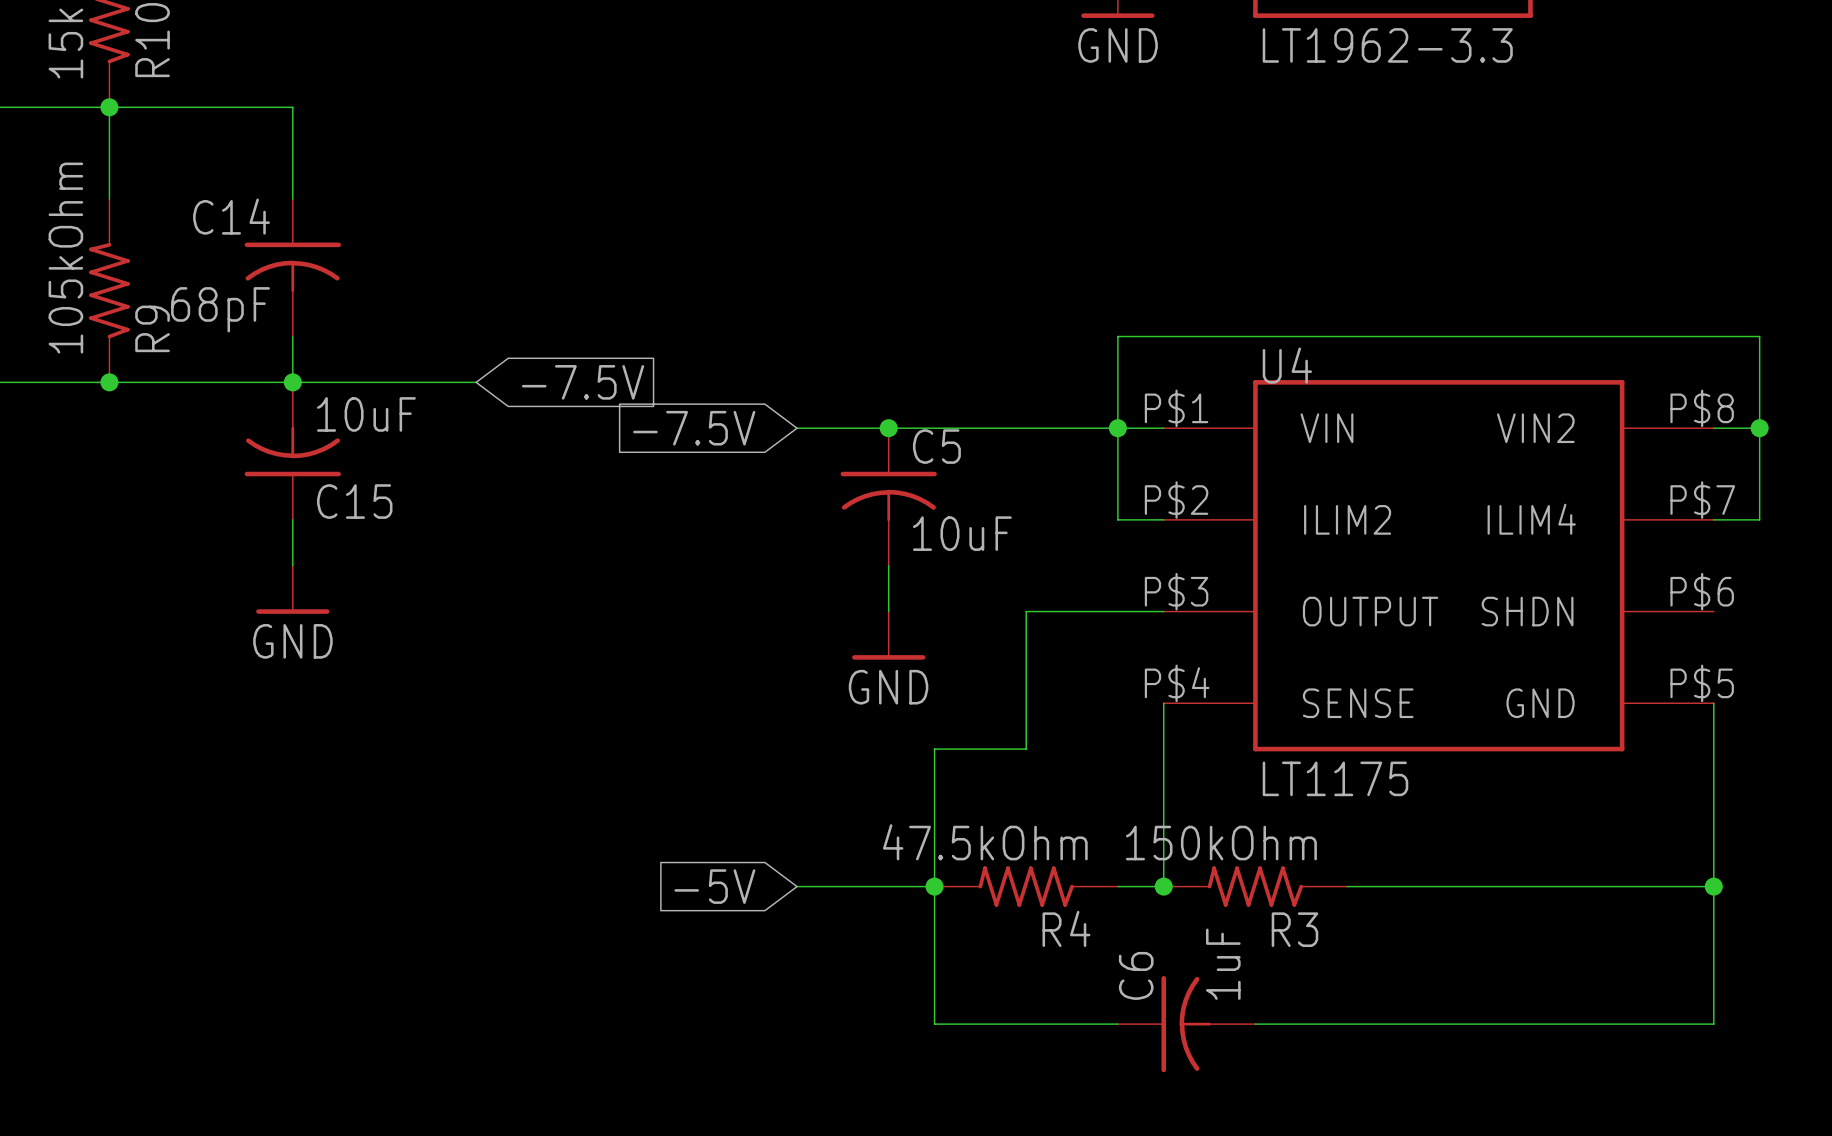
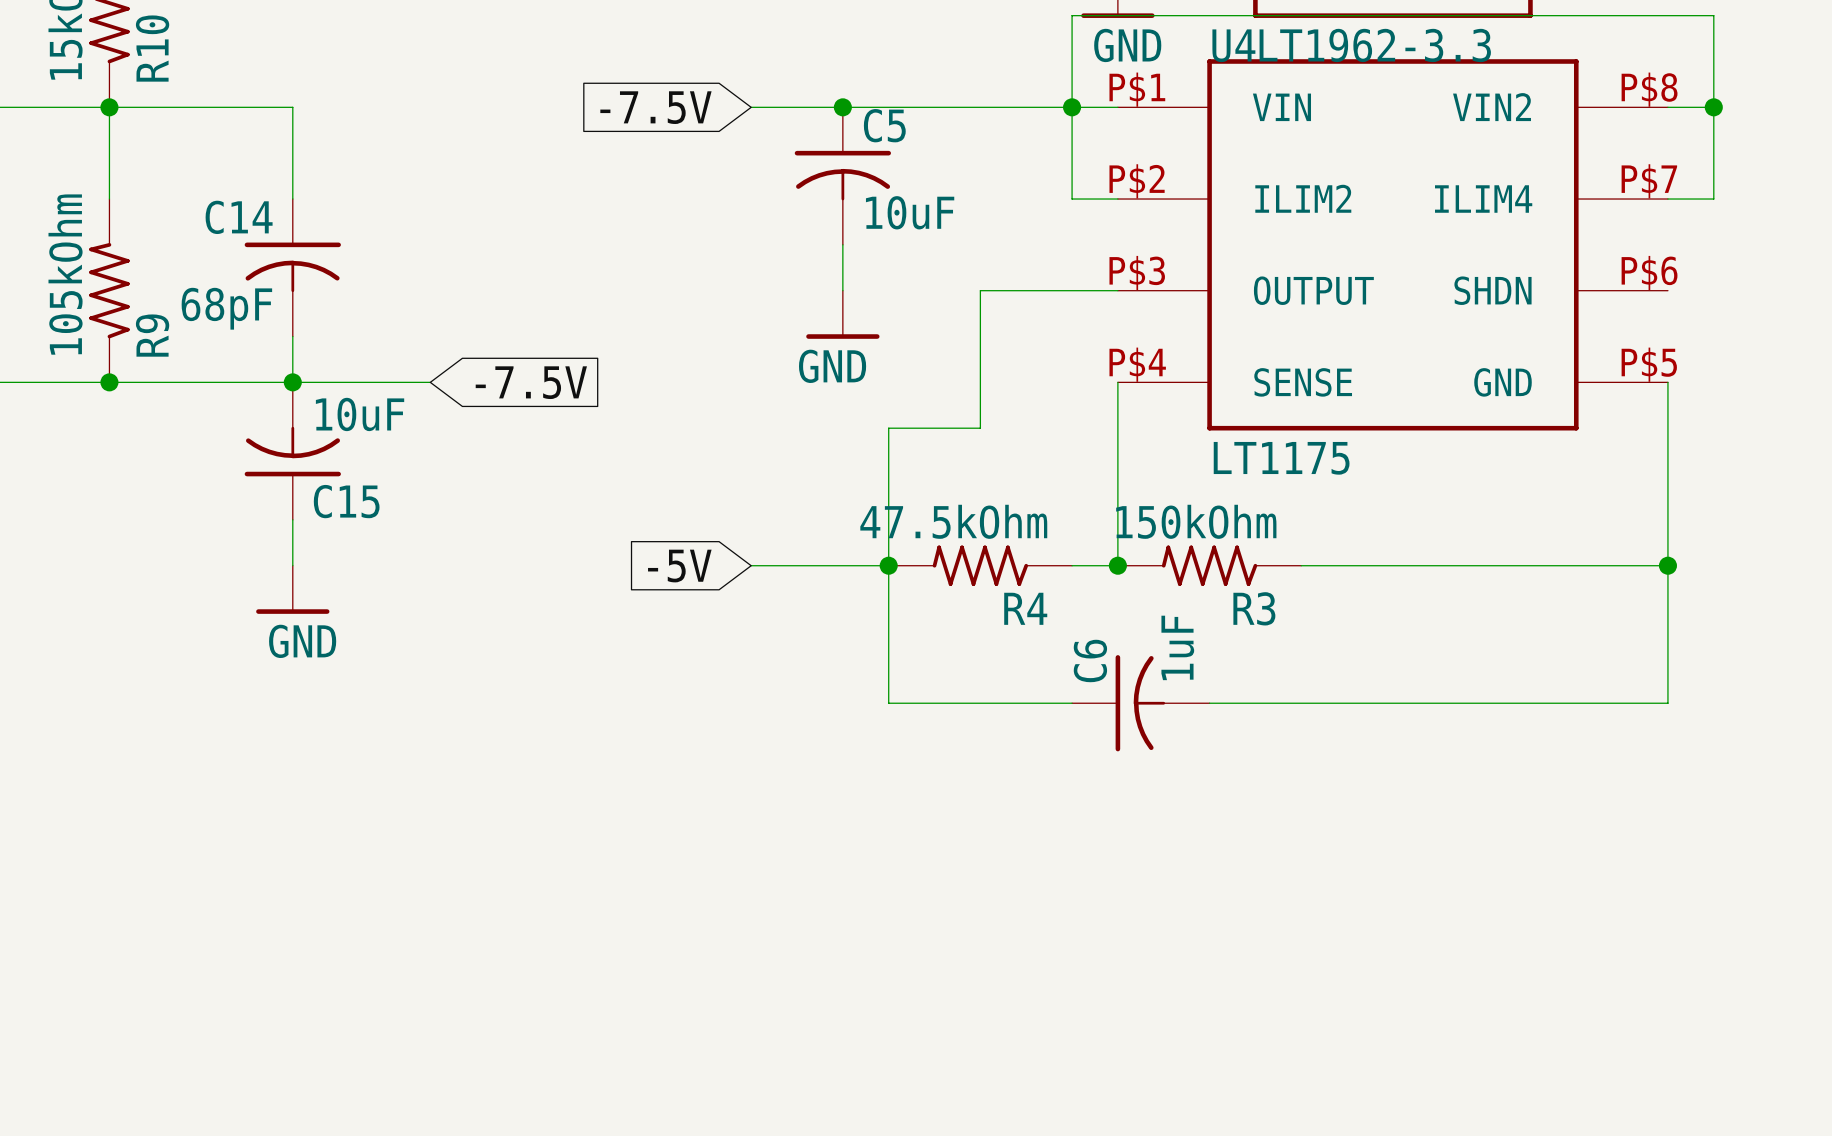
global label: none -> -7.5V (655, 107)
wire: none -> (751, 107) (1117, 107)
junction: none -> (842, 107)
junction: none -> (1072, 107)
junction: none -> (1713, 107)
wire: none -> (1117, 199) (1072, 199) (1072, 15) (1713, 15) (1713, 199) (1667, 199)
wire: none -> (842, 244) (842, 290)
power symbol: none -> GND (842, 314)
wire: (430, 382) (476, 382) -> none
global label position: -7.5V (583, 382) -> -7.5V (531, 382)
wire: (1117, 382) (1117, 336) (1759, 336) (1759, 519) (1713, 519) -> none
global label: -7.5V (694, 428) -> none
wire: (797, 428) (888, 428) -> (751, 565) (888, 565) (888, 428)
junction: (888, 428) -> none
wire: (980, 428) (1163, 428) -> (980, 428) (980, 290) (1117, 290)
junction: (1117, 428) -> none
wire: (1713, 428) (1759, 428) -> (1667, 107) (1713, 107)
junction: (1759, 428) -> none
C5 position: (888, 496) -> (842, 176)
wire: (1117, 519) (1163, 519) -> (1117, 519) (1117, 565) (1072, 565)
junction: none -> (888, 565)
junction: none -> (1117, 565)
U4 position: (1438, 565) -> (1392, 244)
junction: none -> (1667, 565)
wire: none -> (888, 611) (888, 703) (1072, 703)
wire: (1163, 611) (1026, 611) (1026, 749) (934, 749) (934, 1024) (1117, 1024) -> none
power symbol: GND (888, 635) -> none
wire: (1163, 703) (1163, 886) (1117, 886) -> none
wire: (1713, 703) (1713, 1024) (1255, 1024) -> (1667, 382) (1667, 703) (1209, 703)
global label position: -5V (714, 886) -> -5V (679, 566)
wire: (797, 886) (934, 886) -> none
junction: (934, 886) -> none
R4 position: (1026, 886) -> (980, 565)
junction: (1163, 886) -> none
R3 position: (1255, 886) -> (1209, 565)
wire: (1347, 886) (1713, 886) -> (1301, 565) (1667, 565)
junction: (1713, 886) -> none
C6 position: (1186, 1024) -> (1140, 703)

